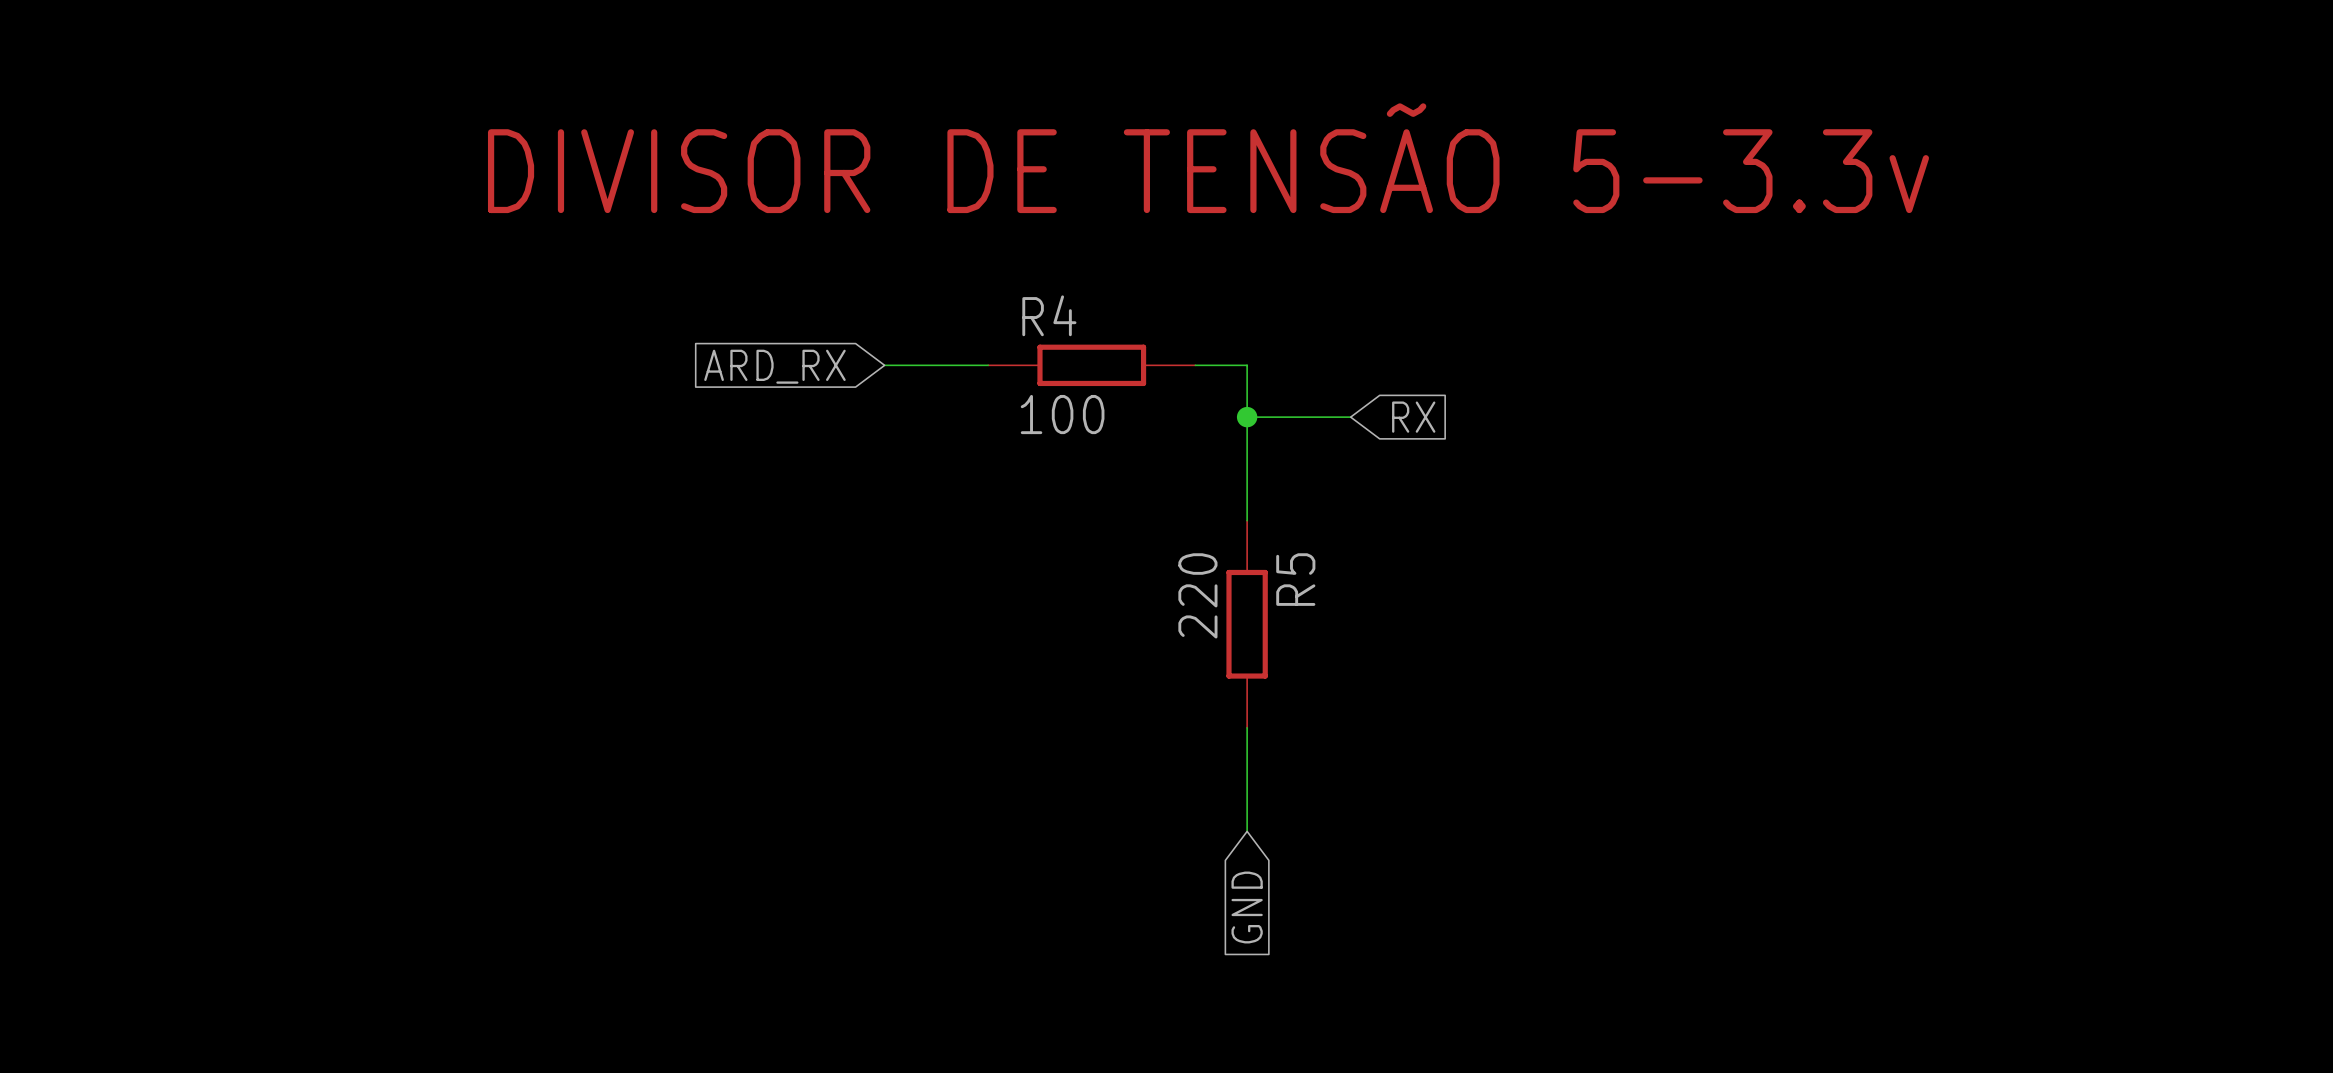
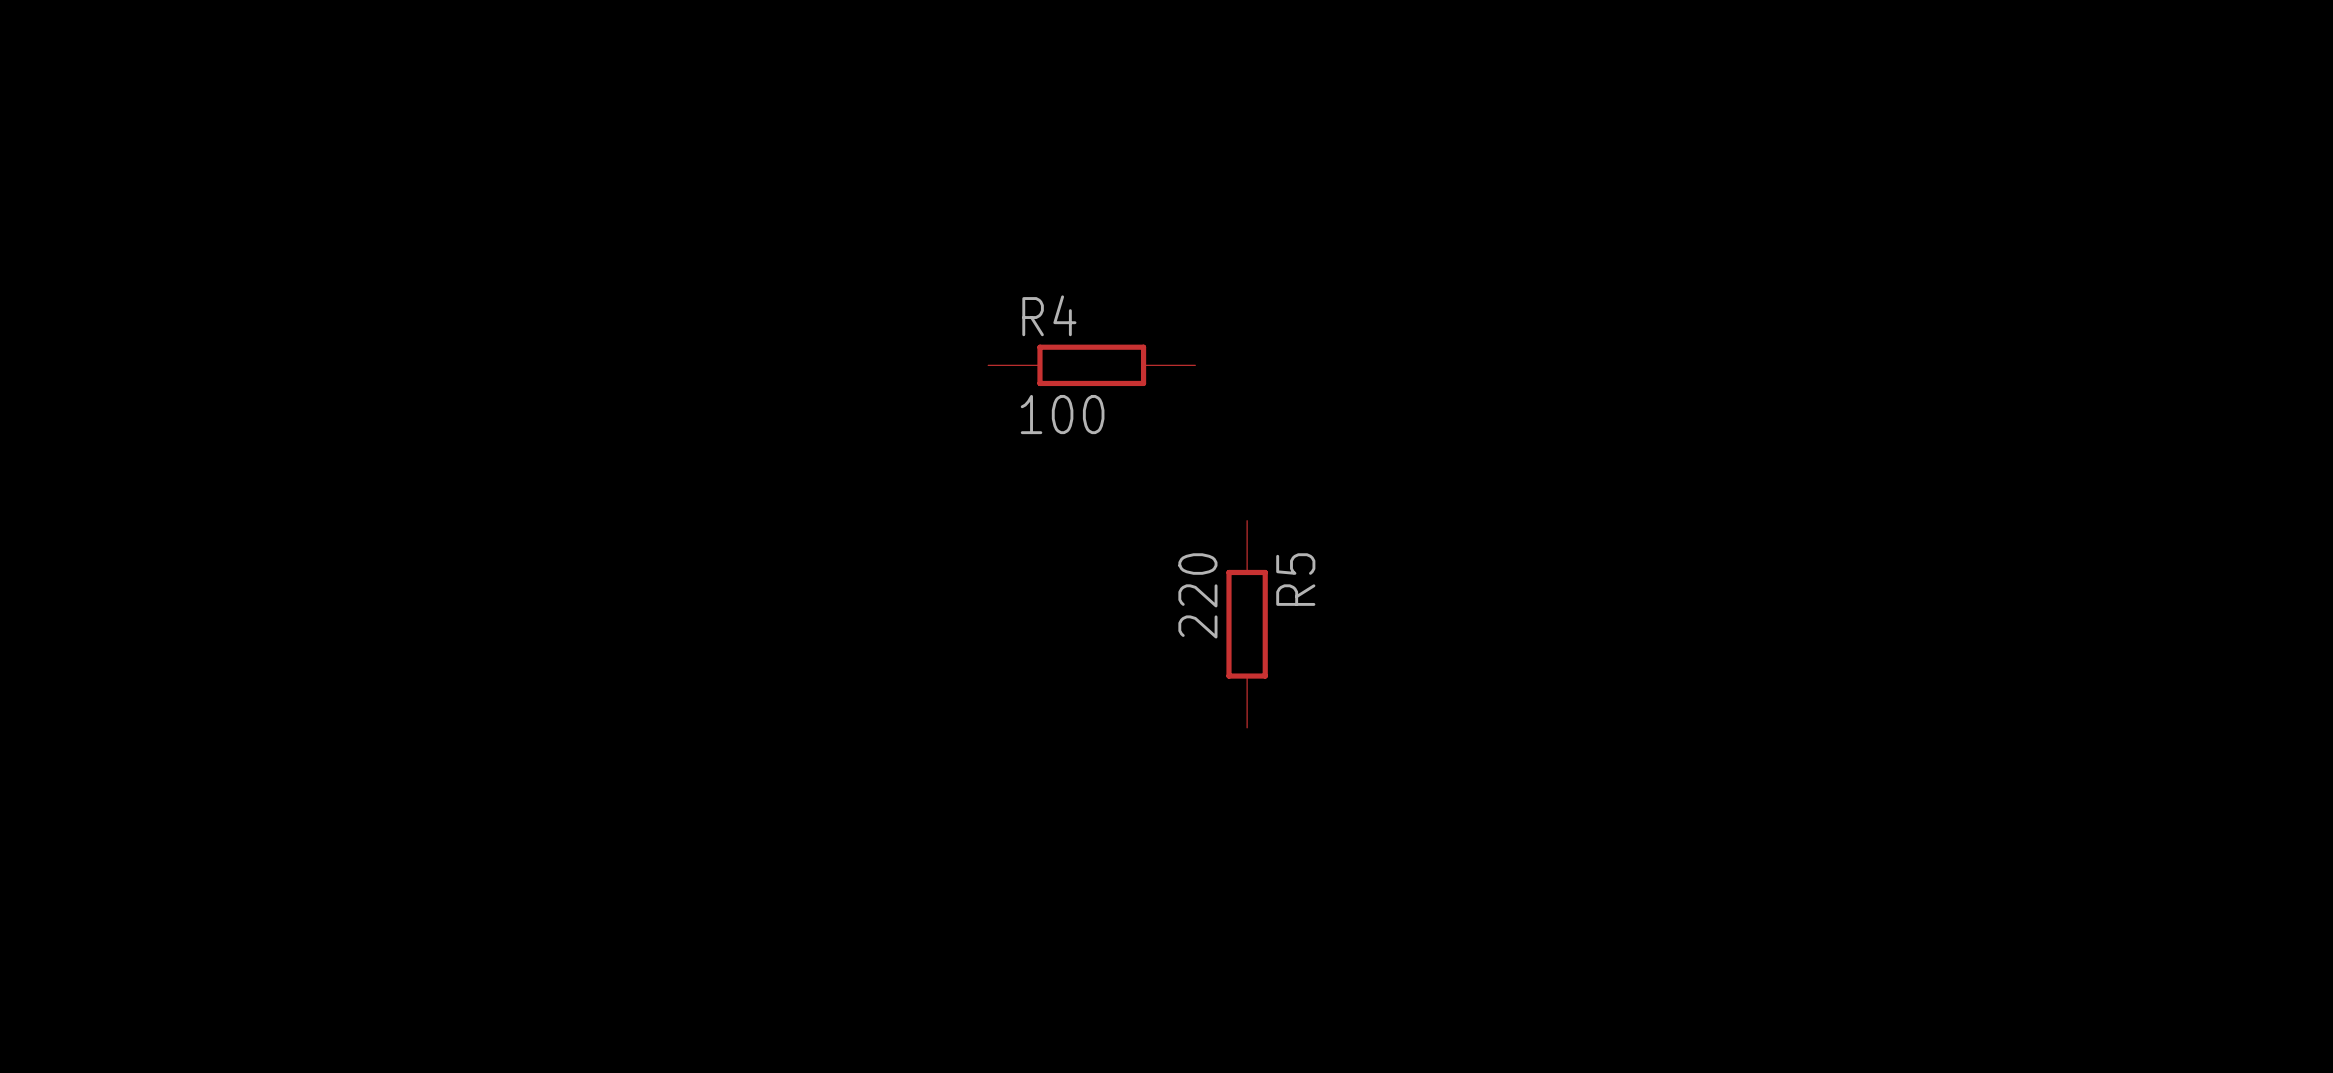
text: DIVISOR DE TENSÃO 5-3.3v (1208, 158) -> none
wire: (884, 365) (988, 365) -> none
wire: (1195, 365) (1247, 365) (1247, 520) -> none
global label: ARD_RX (774, 366) -> none
wire: (1247, 417) (1350, 417) -> none
junction: (1247, 417) -> none
global label: RX (1413, 417) -> none
wire: (1247, 727) (1247, 831) -> none
global label: GND (1247, 907) -> none

